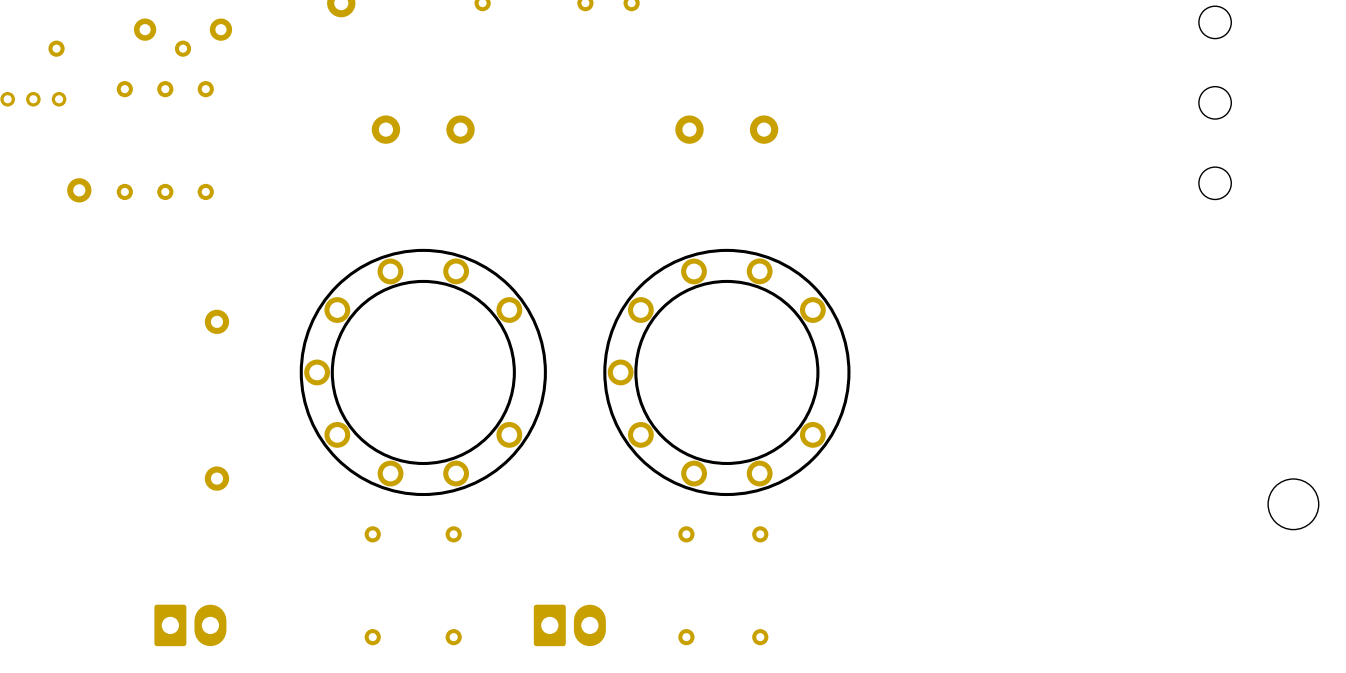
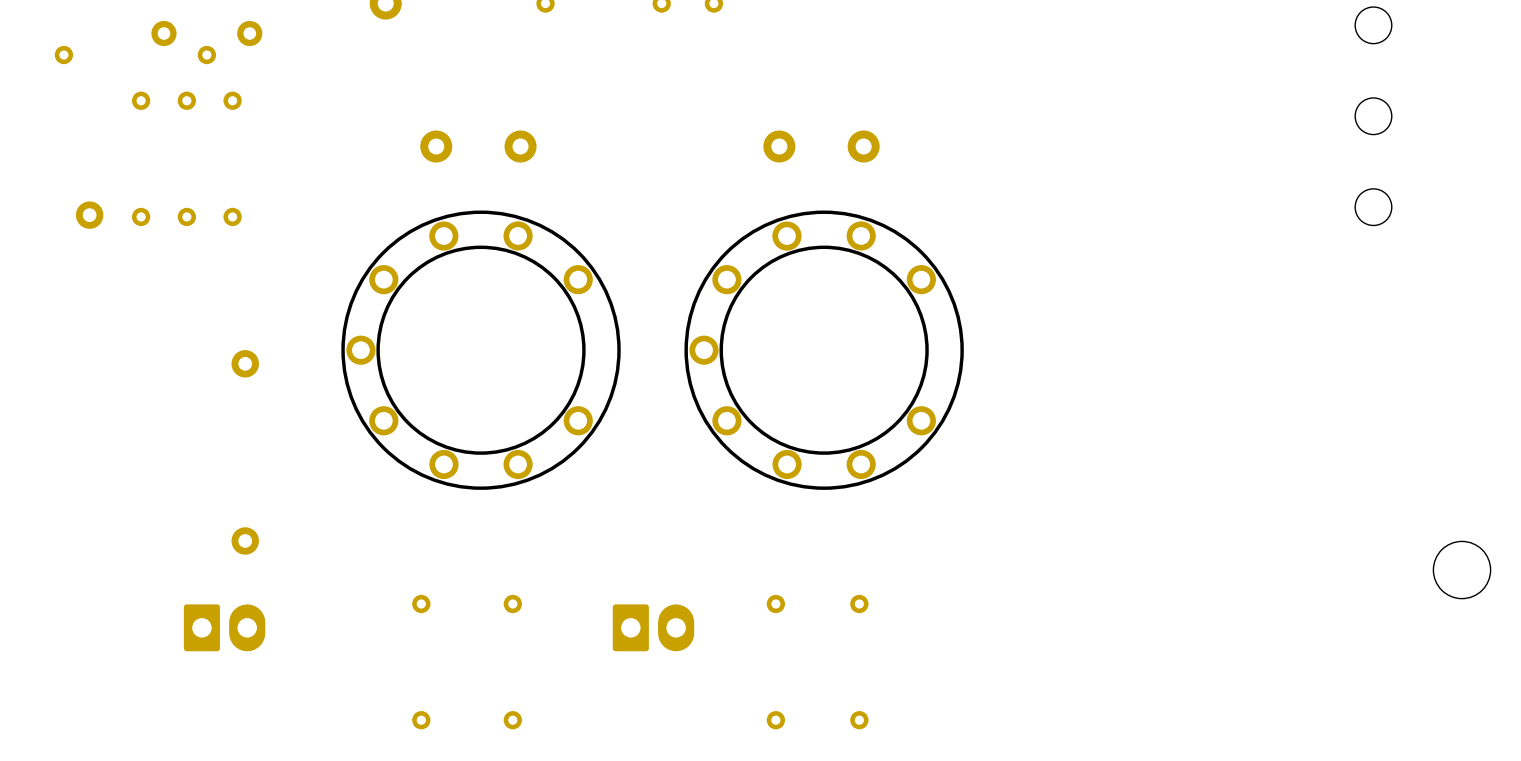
part: (33, 99) -> none
part position: (423, 372) -> (481, 350)
part position: (726, 372) -> (824, 350)
part position: (190, 625) -> (224, 627)
part position: (569, 625) -> (653, 627)

